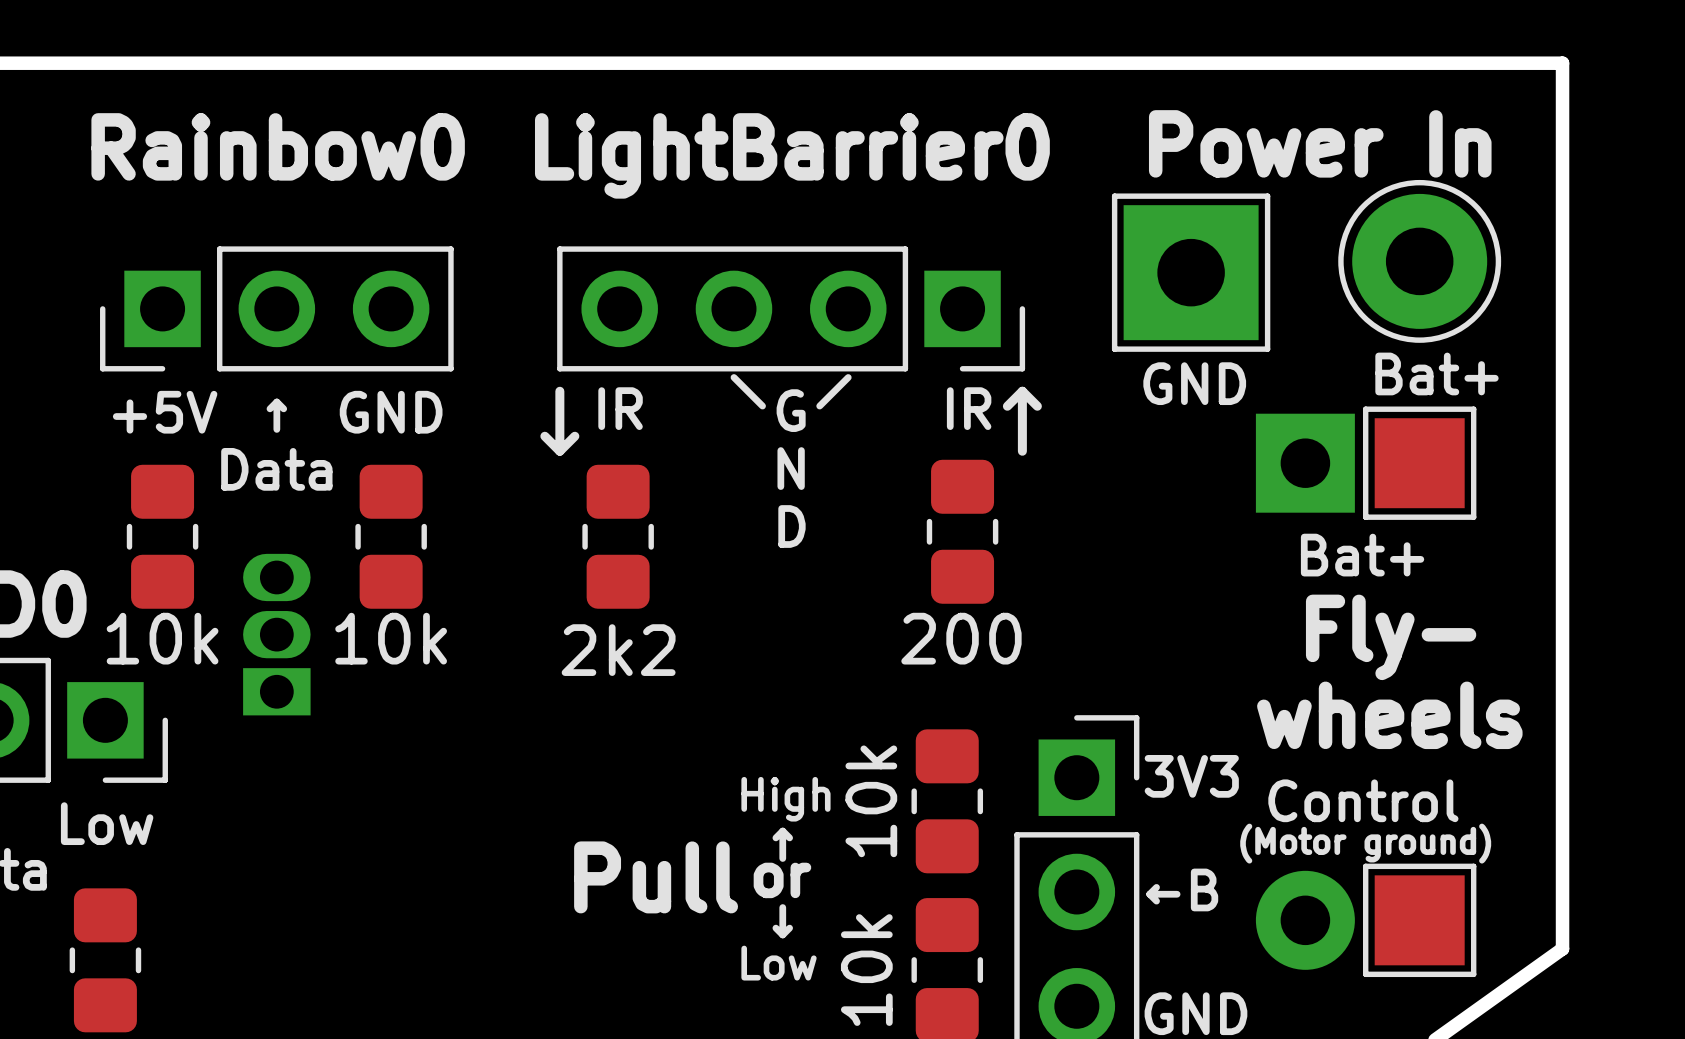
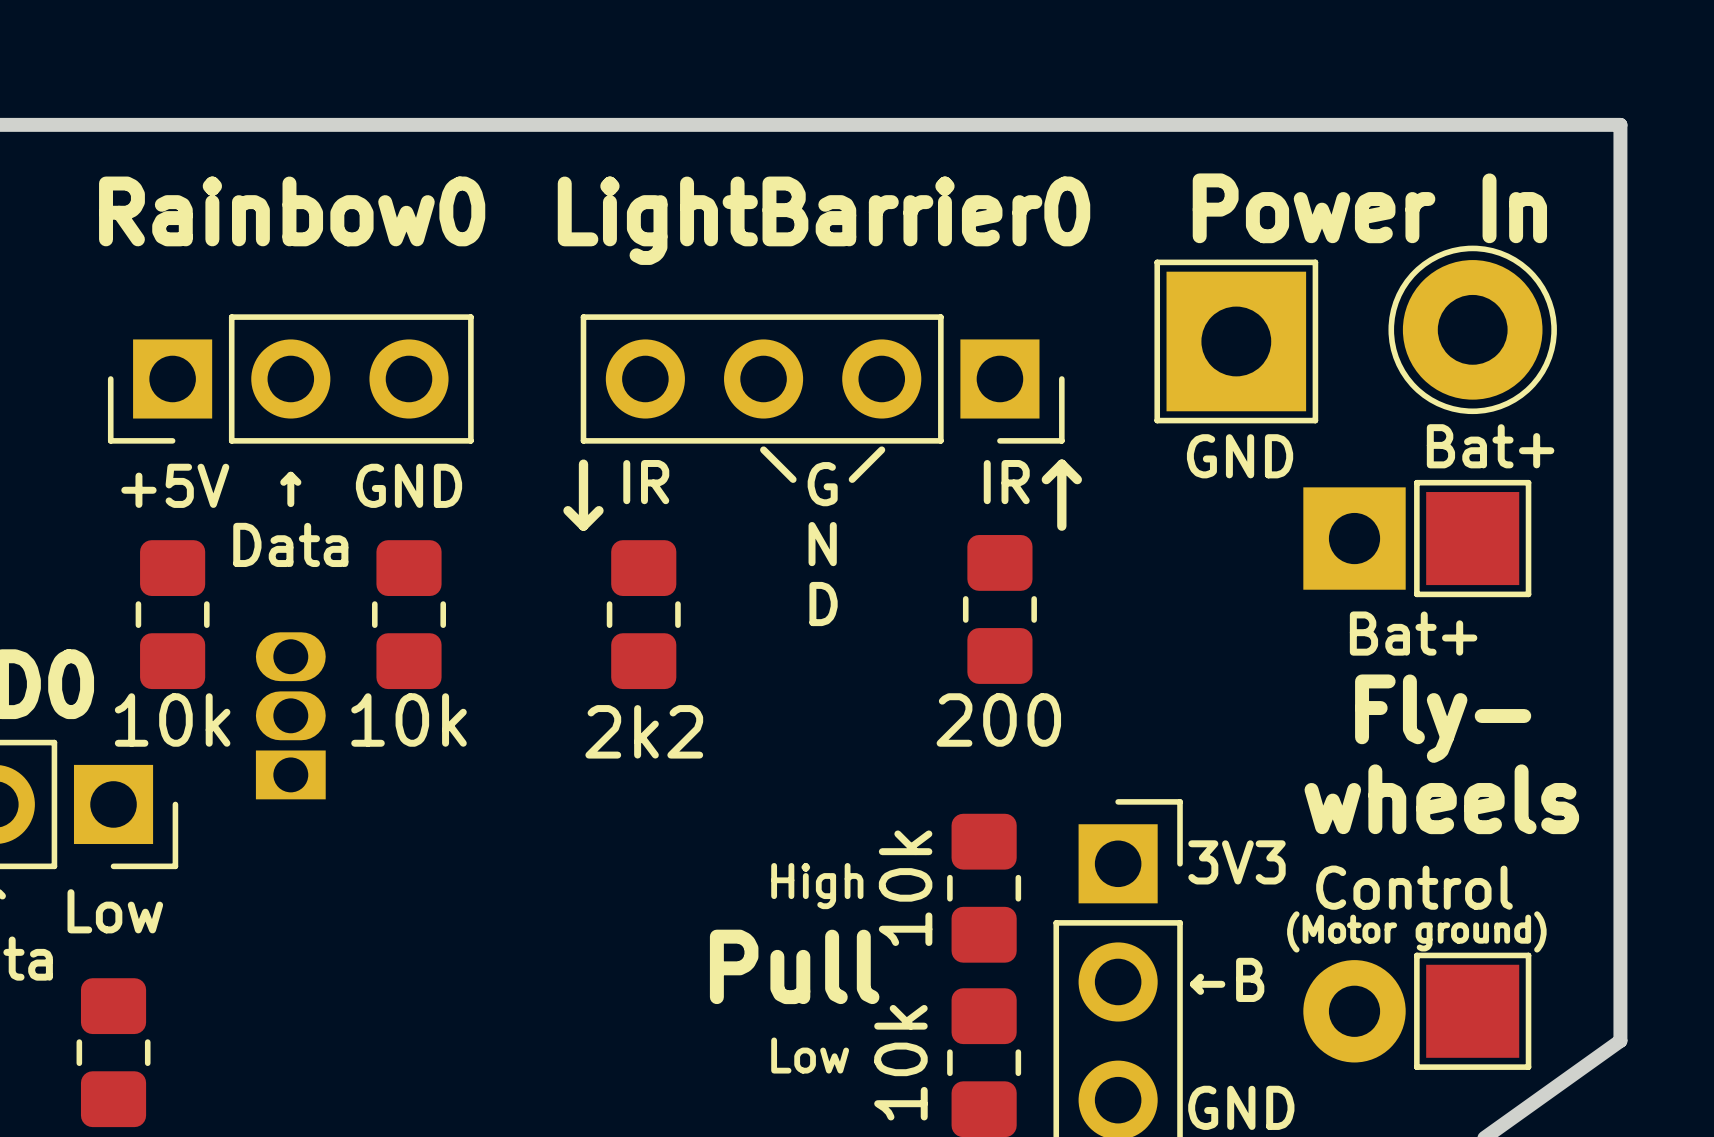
text: ↑ (782, 844) -> none
text position: Pull (656, 877) -> Pull (794, 966)
text: or (782, 880) -> none
text: ↓ (782, 921) -> none

